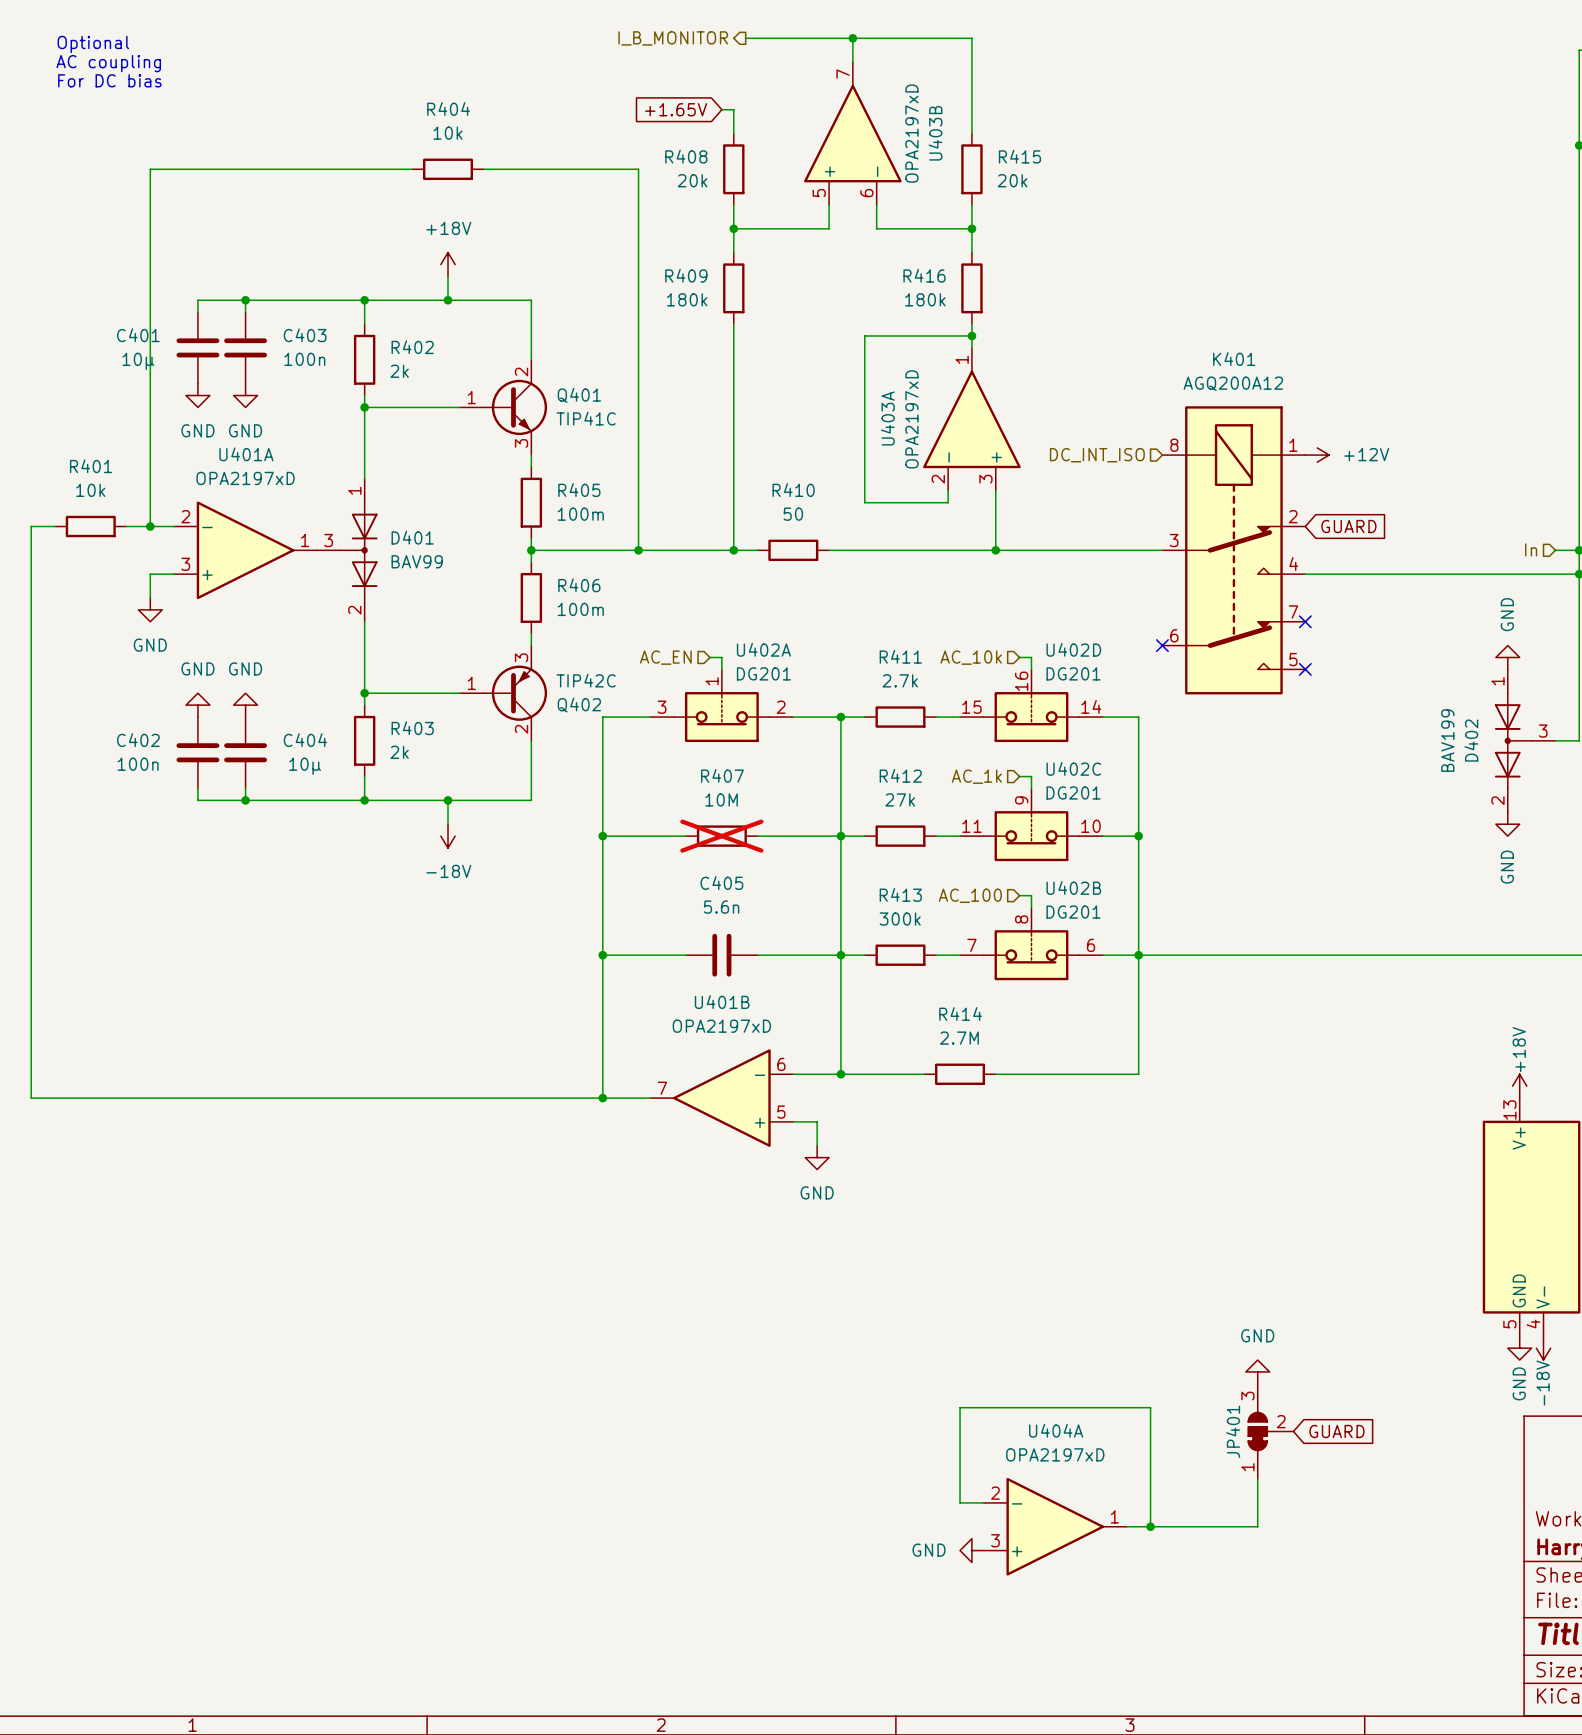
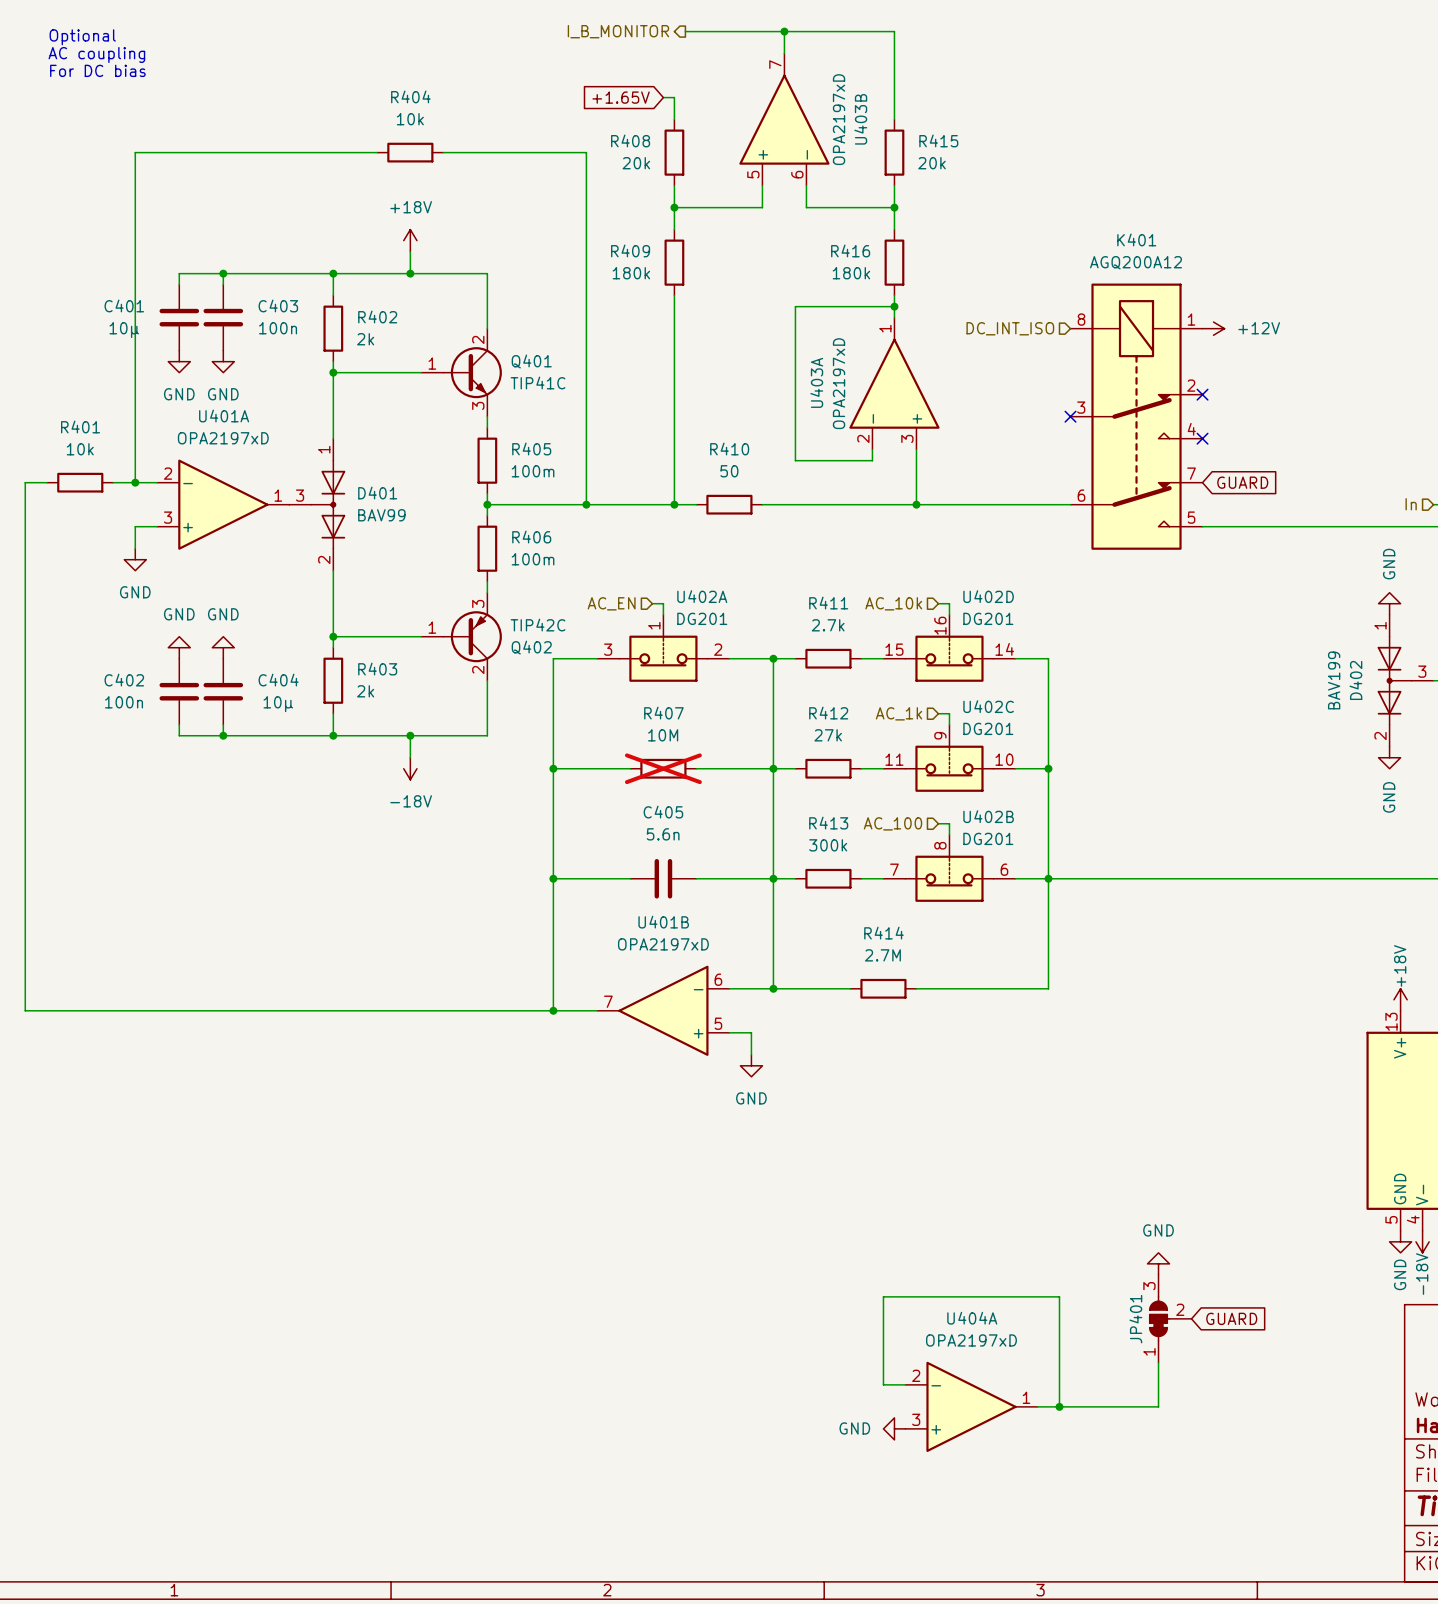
no-connect mark: none -> (1202, 394)
hierarchical label position: DC_INT_ISO (1097, 455) -> DC_INT_ISO (1010, 328)
no-connect mark: none -> (1070, 416)
power symbol position: +12V (1317, 455) -> +12V (1213, 328)
no-connect mark: none -> (1202, 438)
K401 position: (1233, 550) -> (1136, 416)
no-connect mark: (1305, 621) -> none
no-connect mark: (1162, 645) -> none
no-connect mark: (1305, 669) -> none

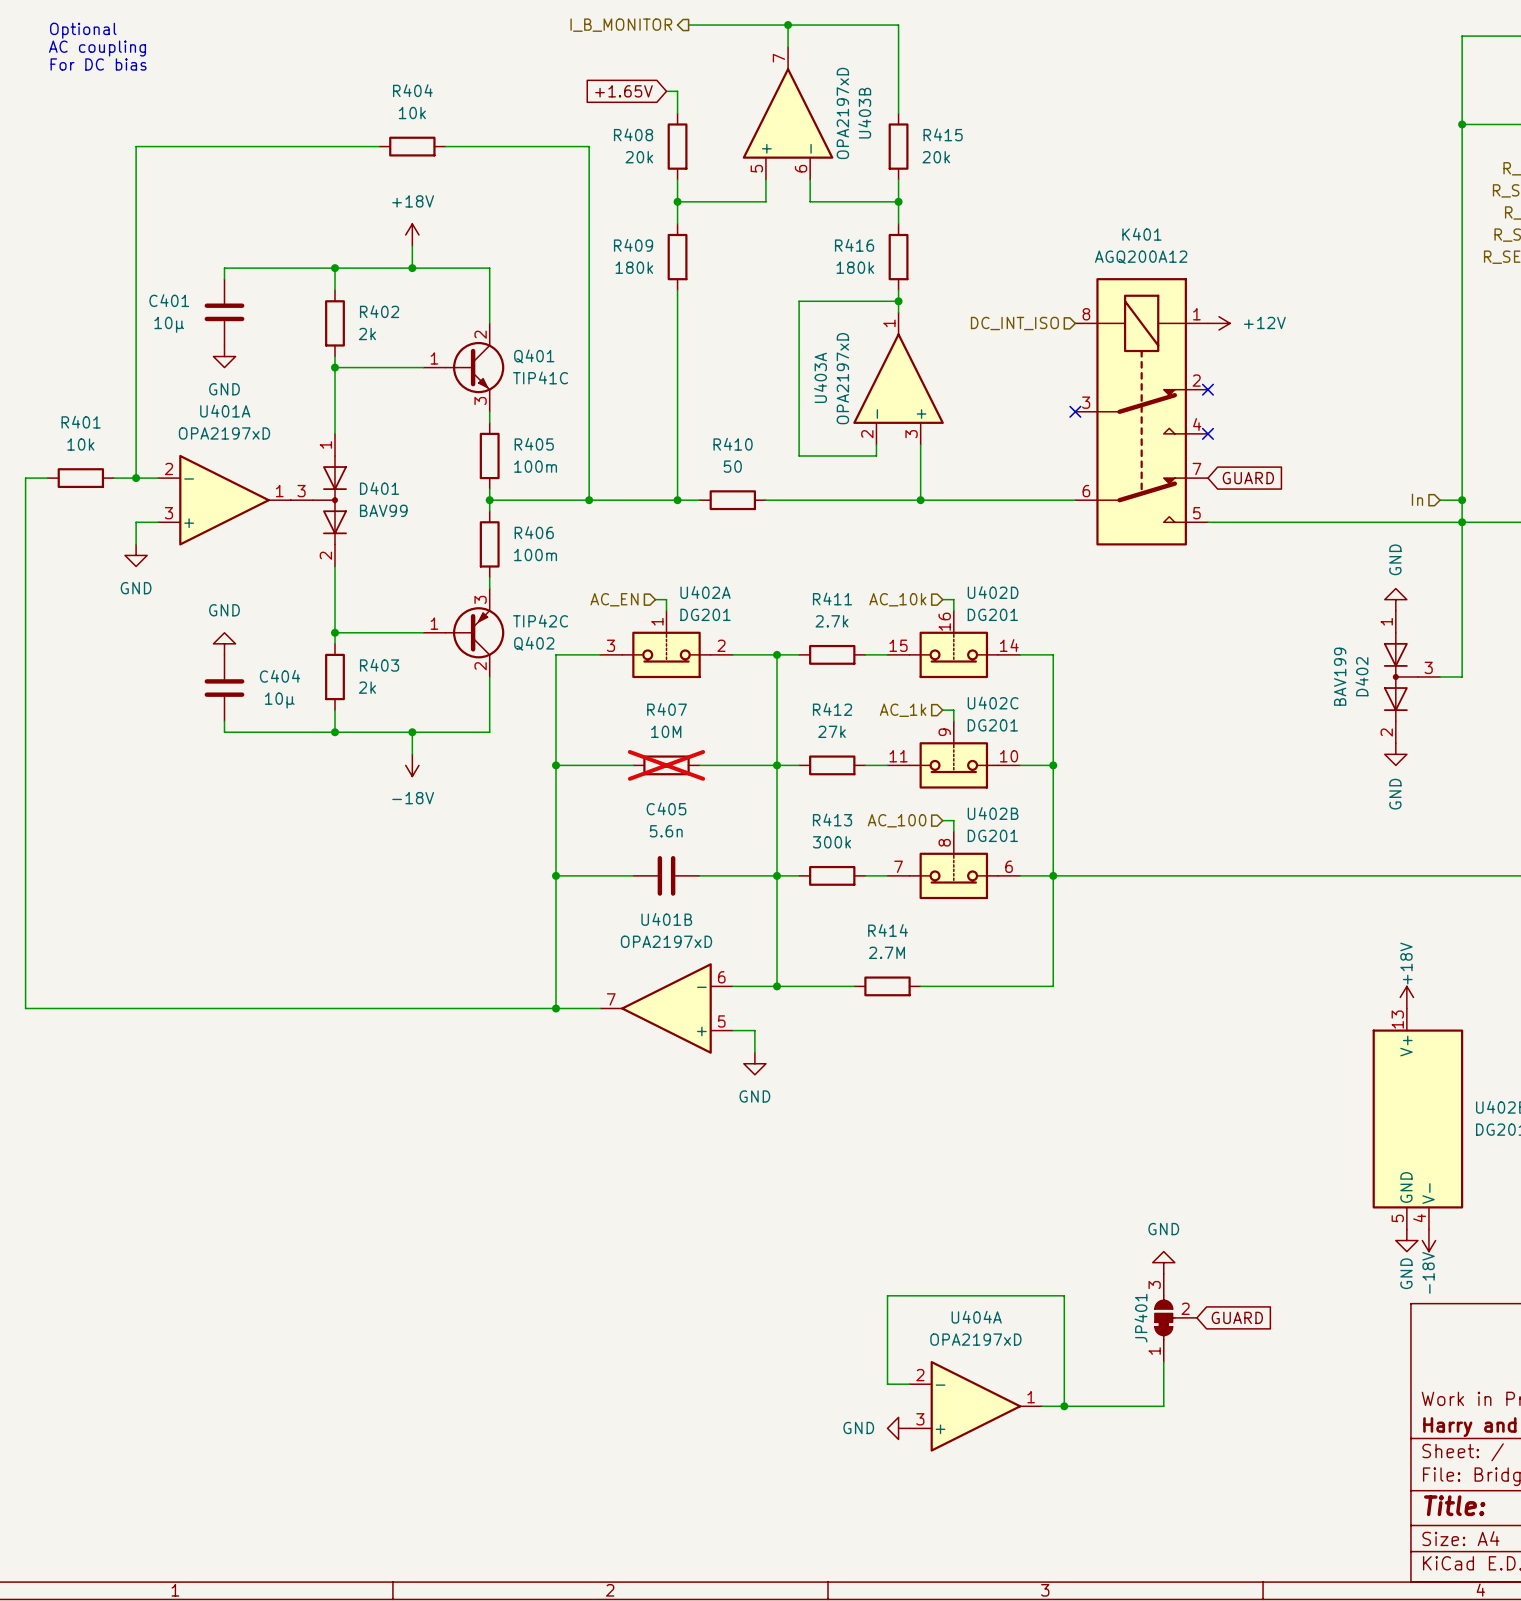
wire: (223, 273) (179, 273) (179, 284) -> none
junction: (223, 273) -> none
C403 name: C403 (278, 305) -> C401 (169, 300)
C401: 10µ (179, 317) -> none
C403 value: 100n (278, 328) -> 10µ (169, 324)
power symbol: GND (179, 361) -> none
power symbol: GND (179, 647) -> none
C402: 100n (179, 691) -> none
wire: (179, 724) (179, 735) (223, 735) -> none
junction: (223, 735) -> none

